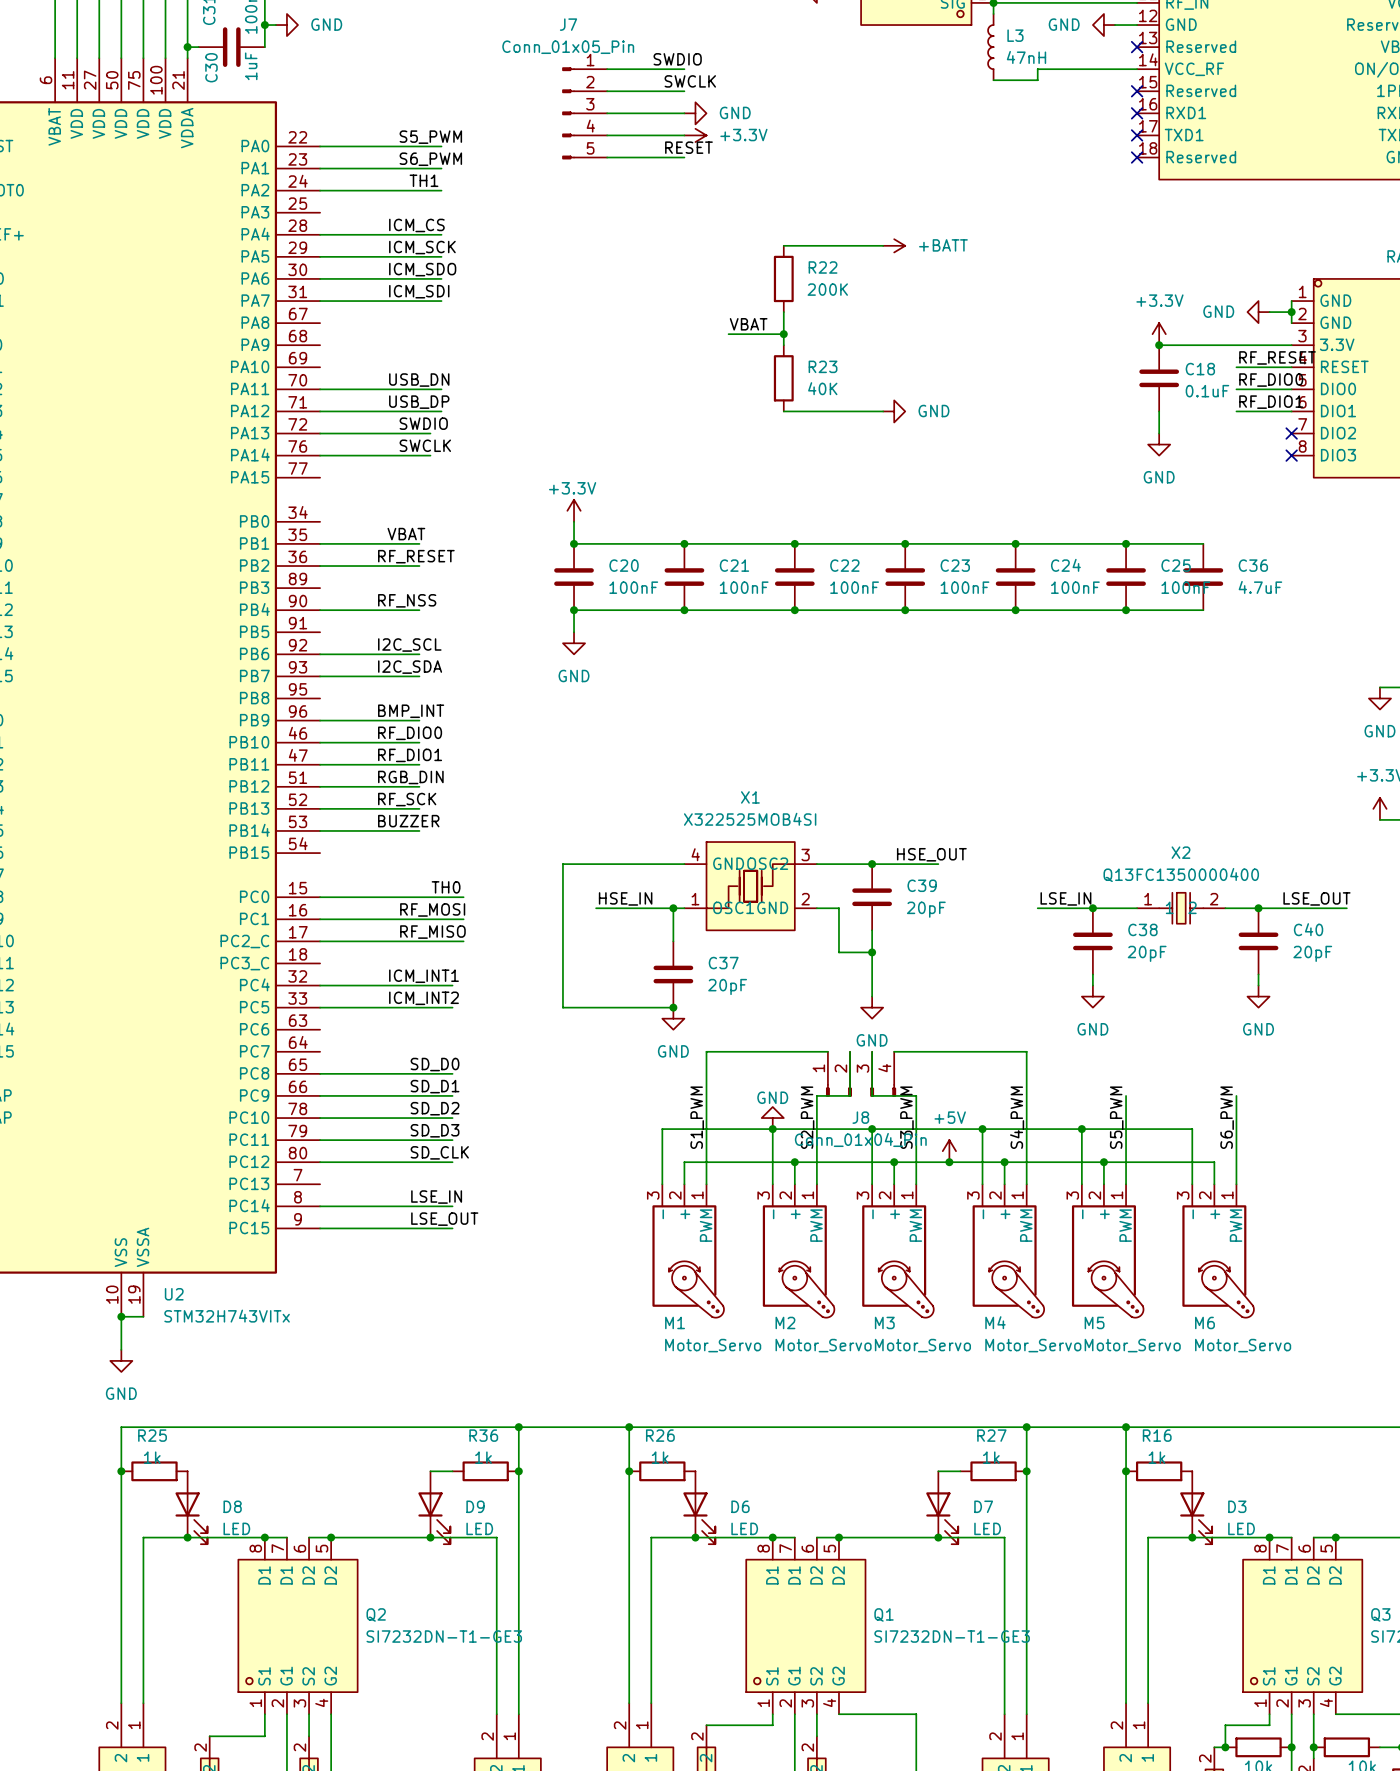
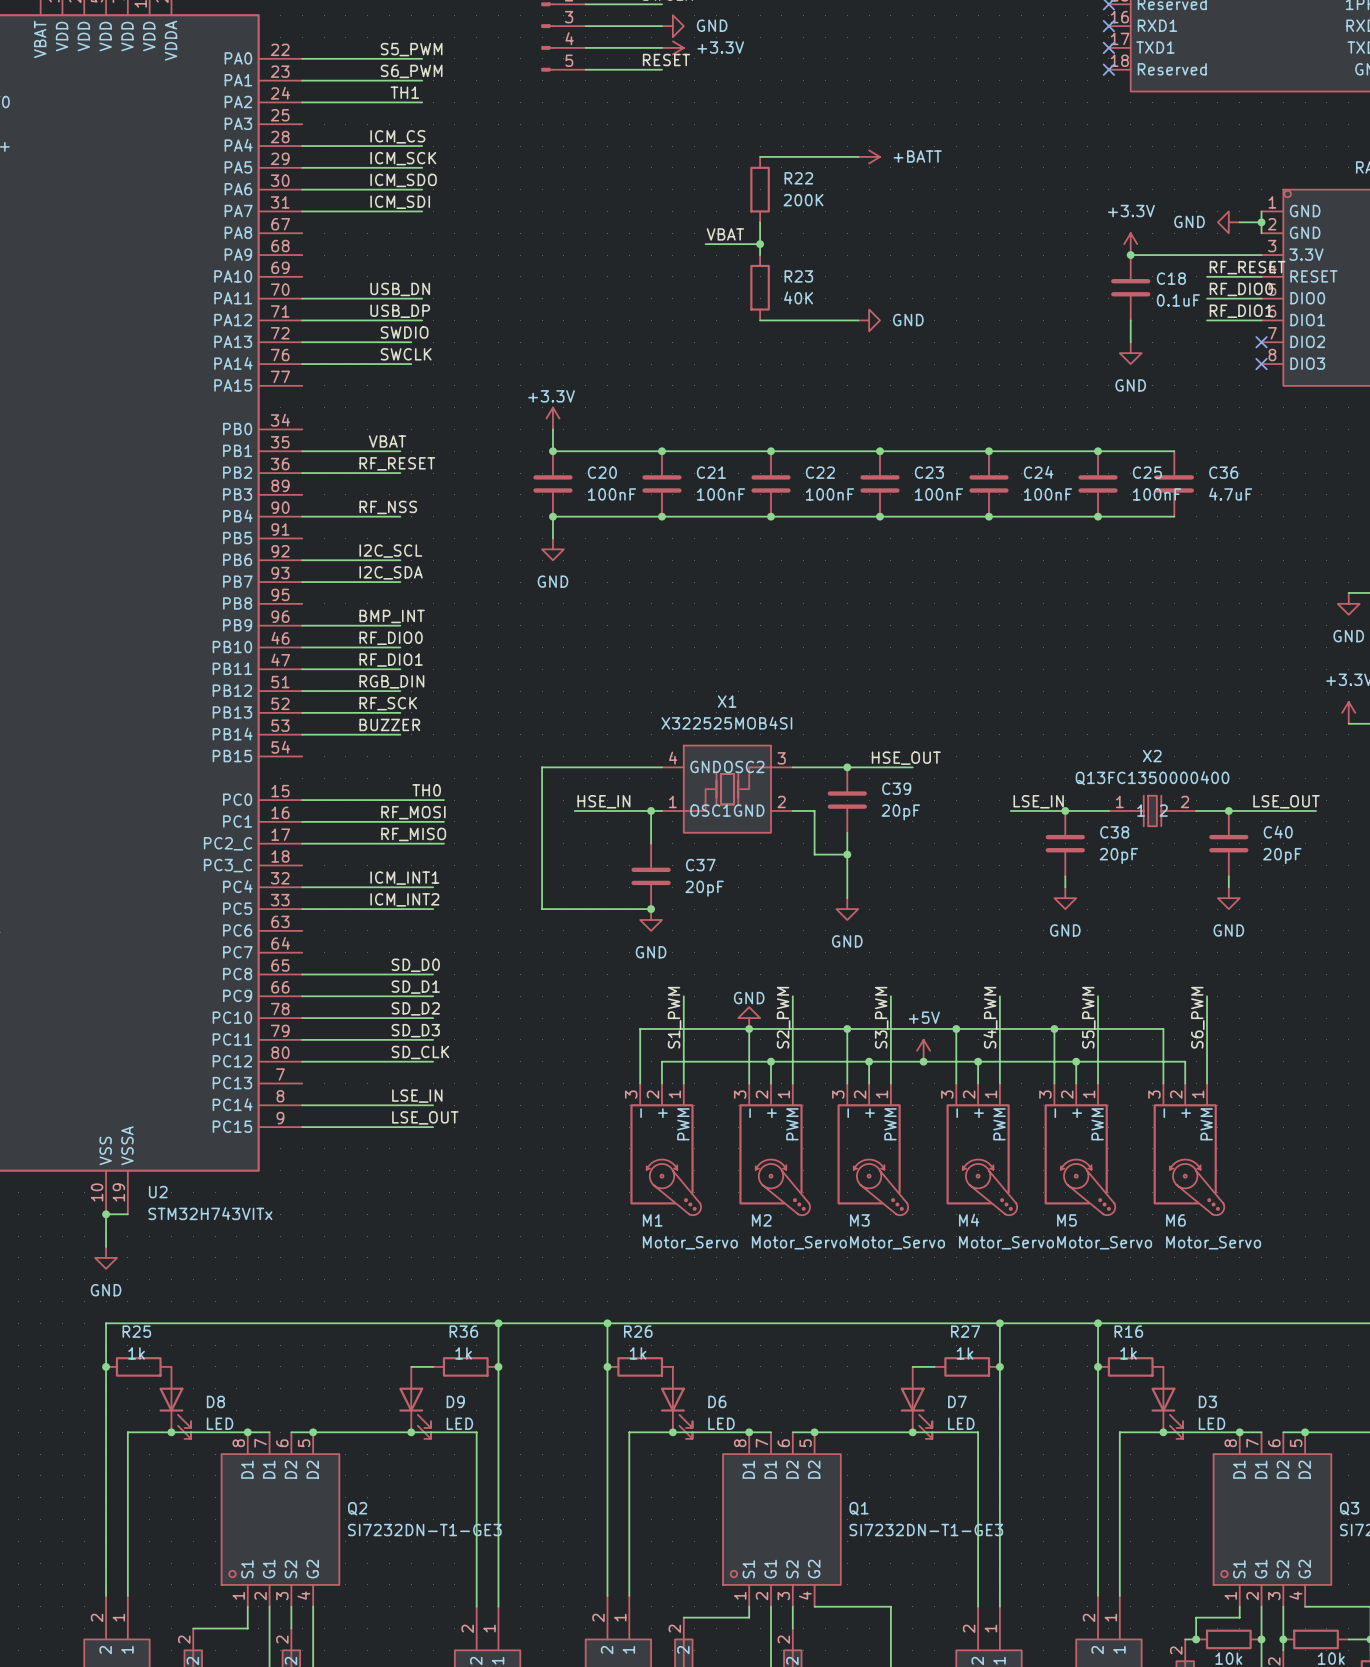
wire: (827, 1051) (706, 1051) (706, 1095) -> none
wire: (850, 1051) (850, 1095) (816, 1095) -> none
wire: (872, 1051) (872, 1095) (916, 1095) -> none
wire: (894, 1051) (1026, 1051) (1026, 1095) -> none
J8: Conn_01x04_Pin (861, 1074) -> none

